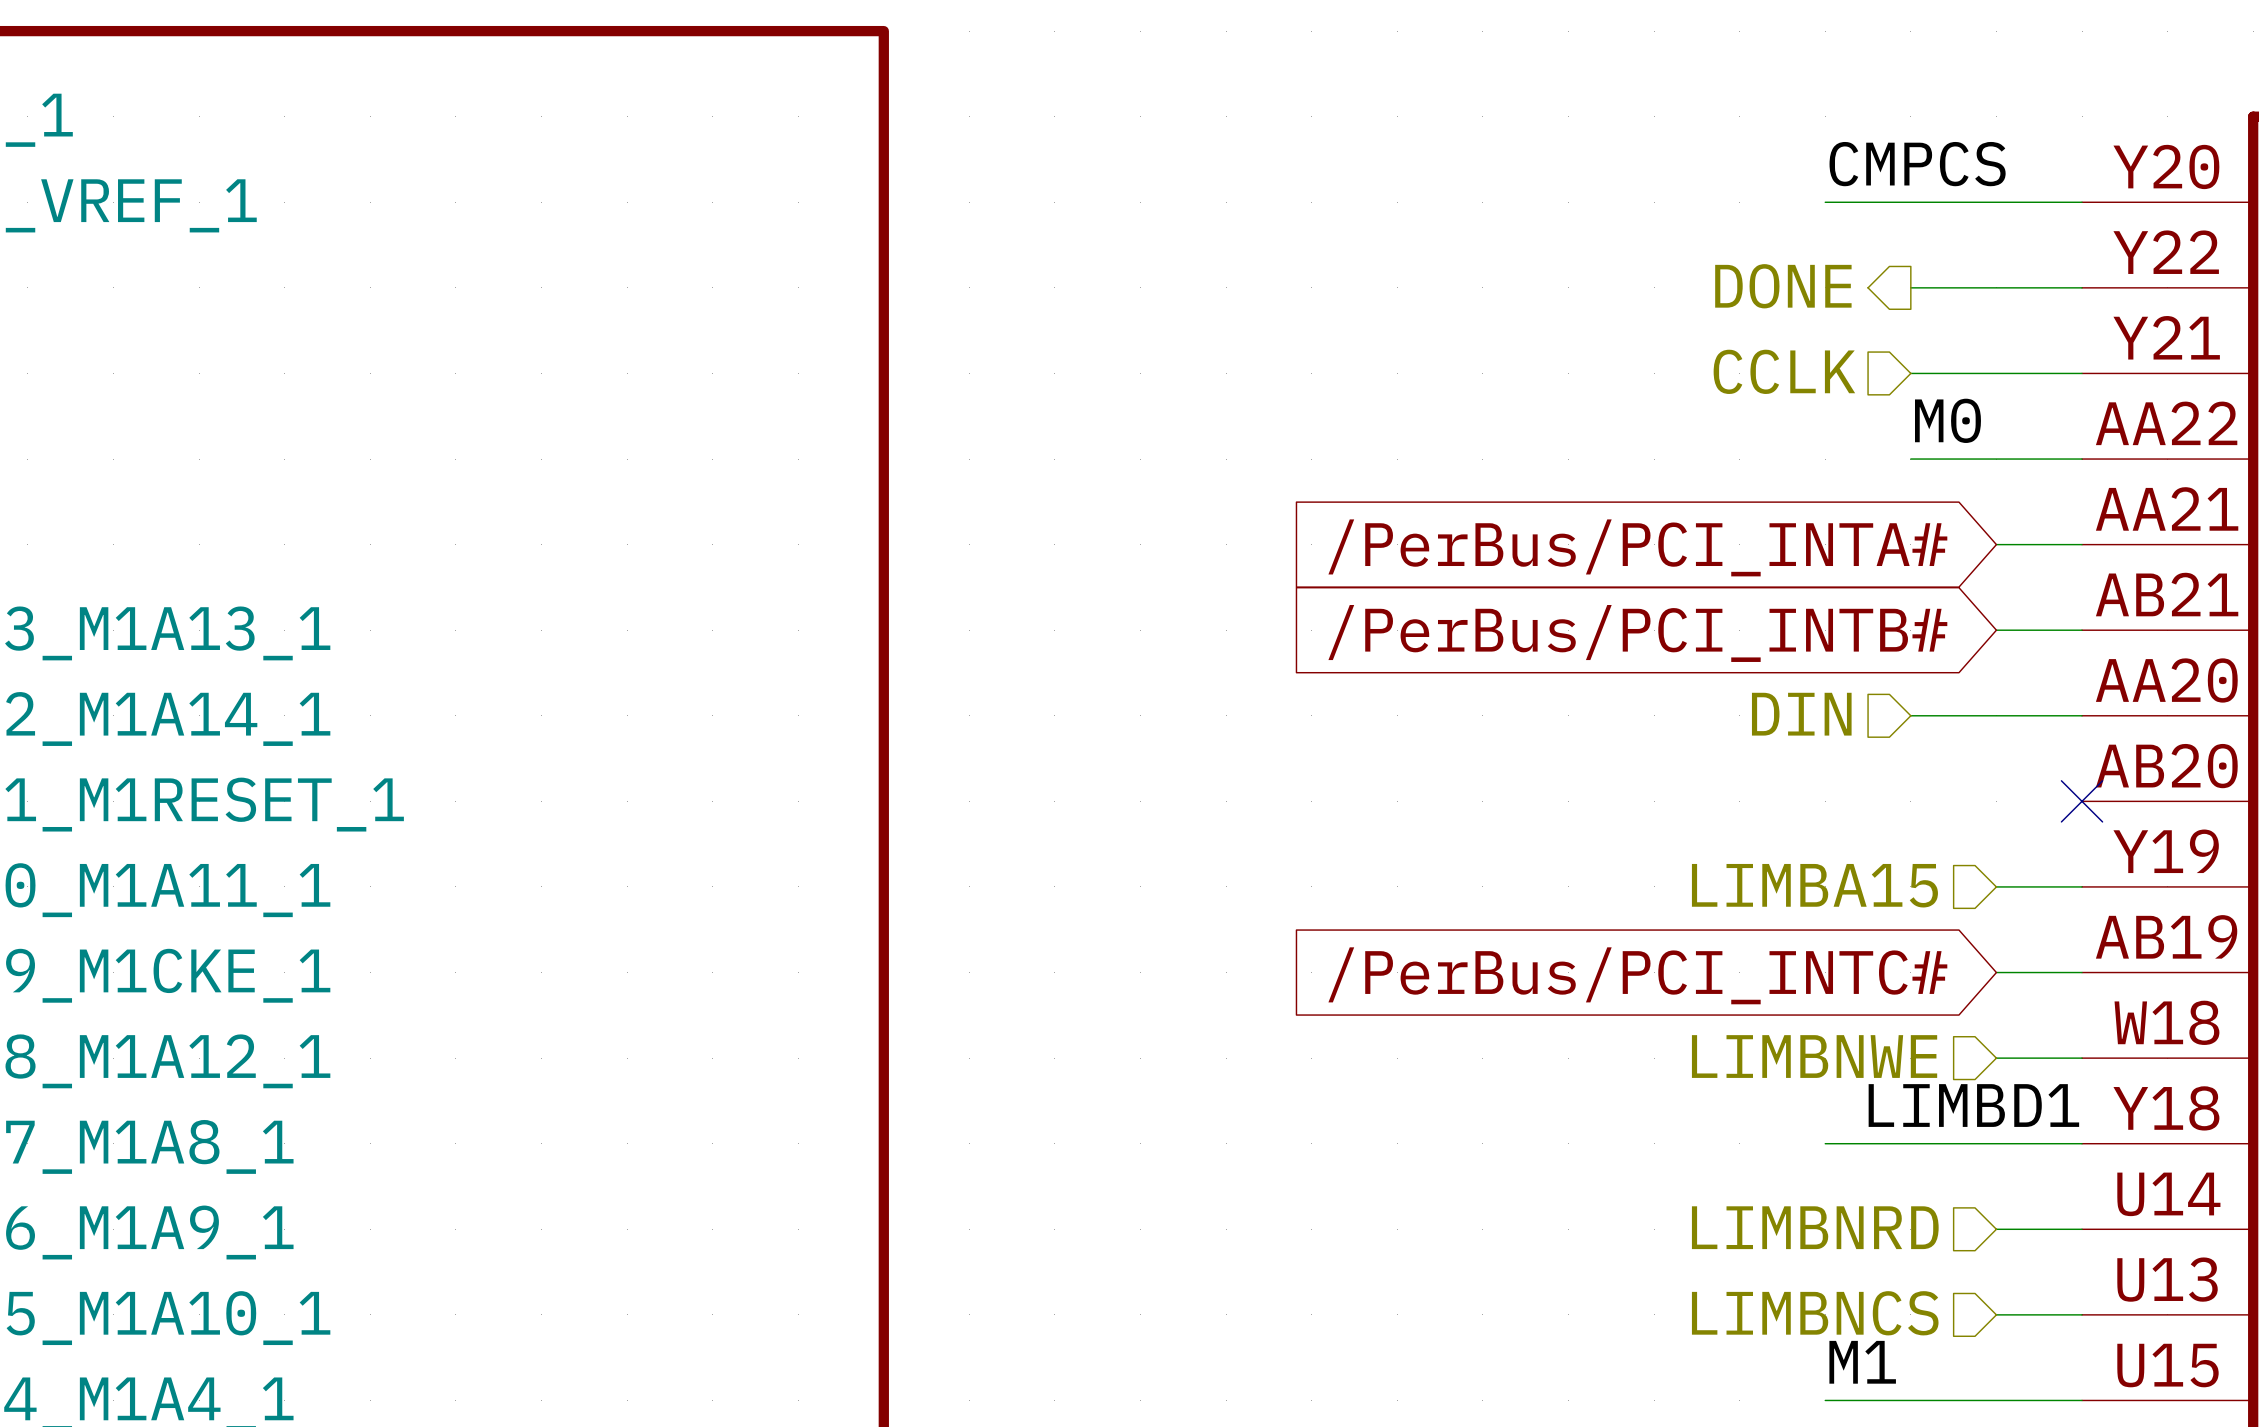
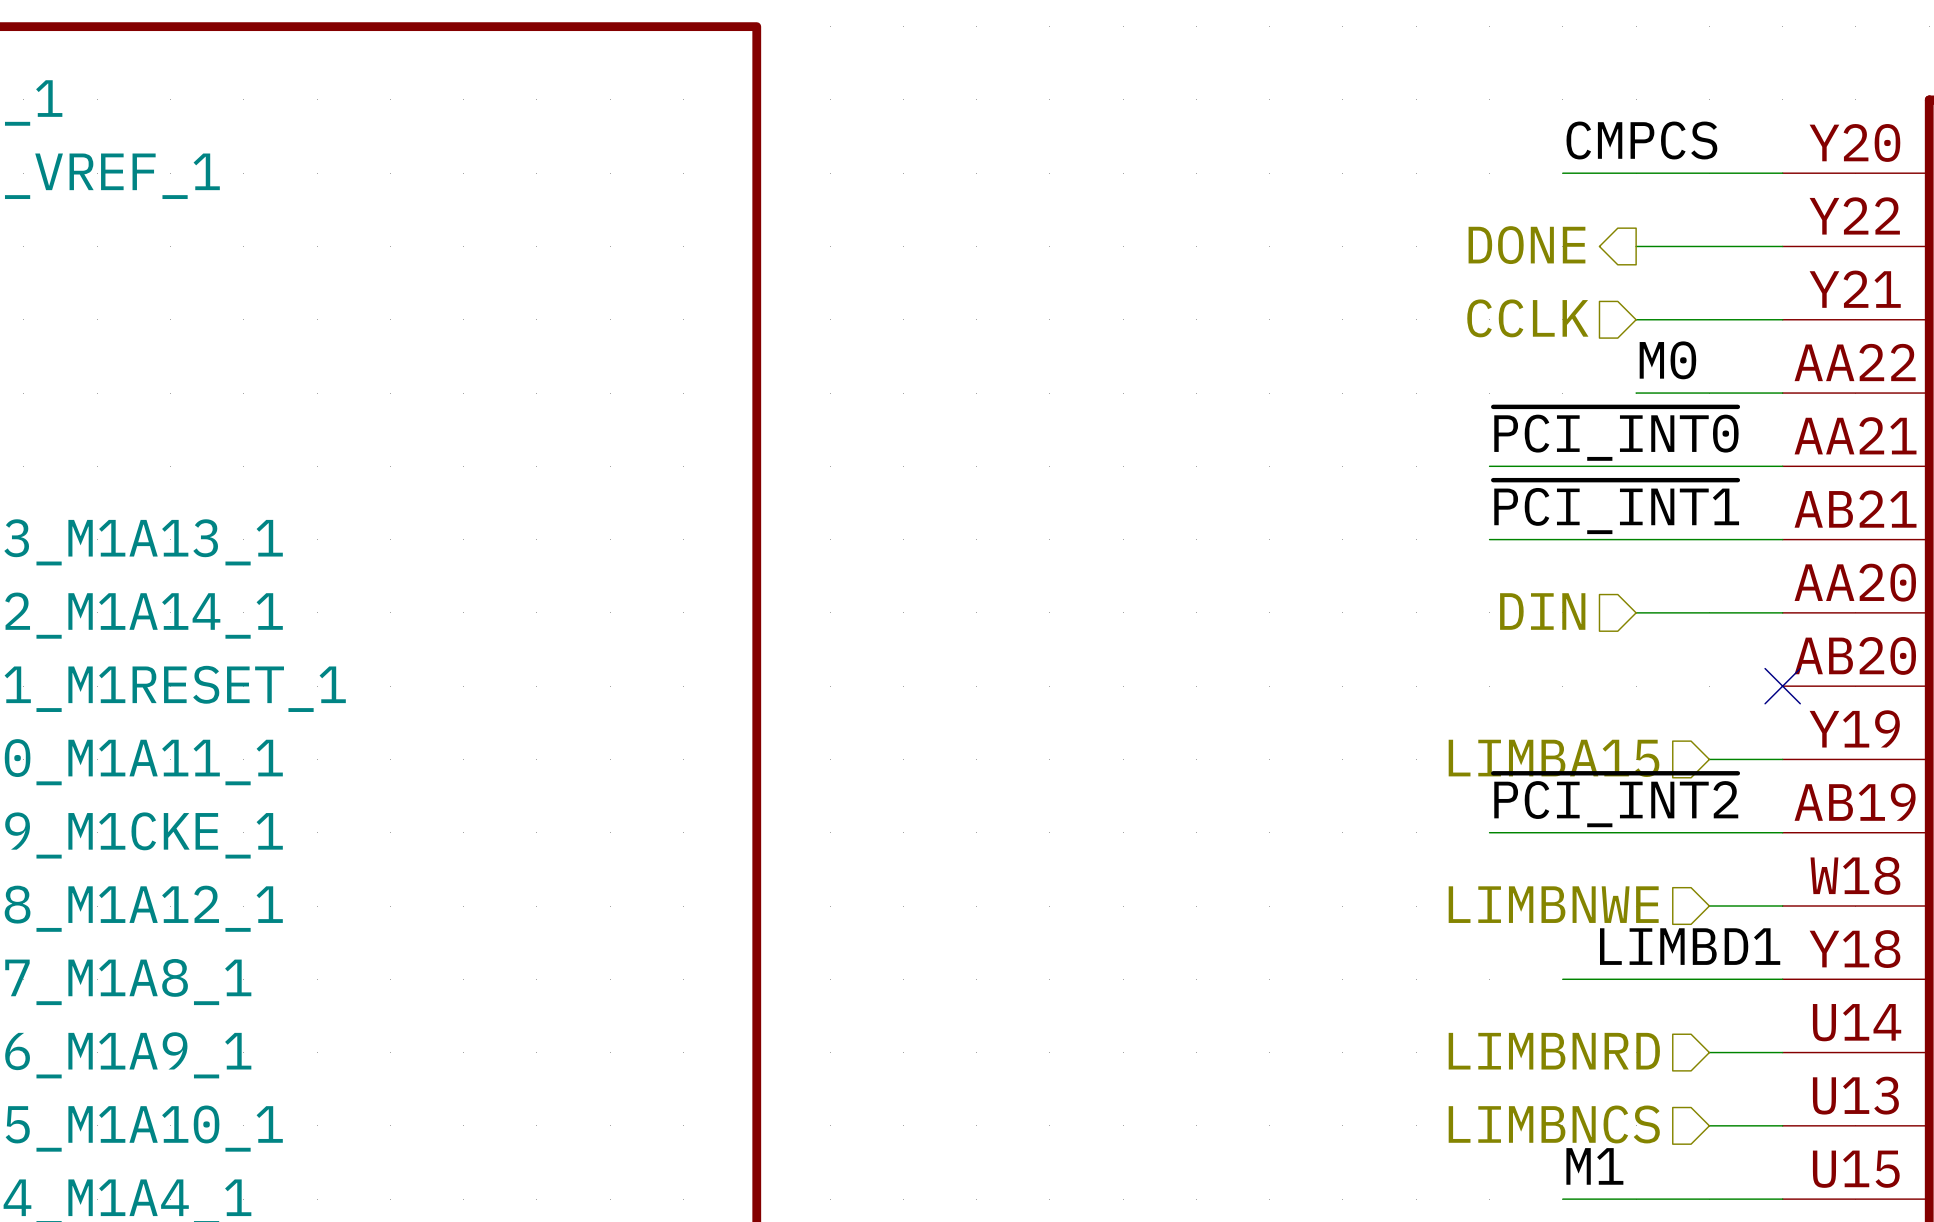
label: none -> ~{PCI_INT0} (1615, 433)
wire: none -> (1489, 466) (1709, 466)
global label: /PerBus/PCI_INTA# (1637, 547) -> none
label: none -> ~{PCI_INT1} (1616, 507)
wire: none -> (1489, 539) (1709, 539)
global label: /PerBus/PCI_INTB# (1637, 633) -> none
label: none -> ~{PCI_INT2} (1615, 800)
wire: none -> (1489, 832) (1709, 832)
global label: /PerBus/PCI_INTC# (1637, 975) -> none

